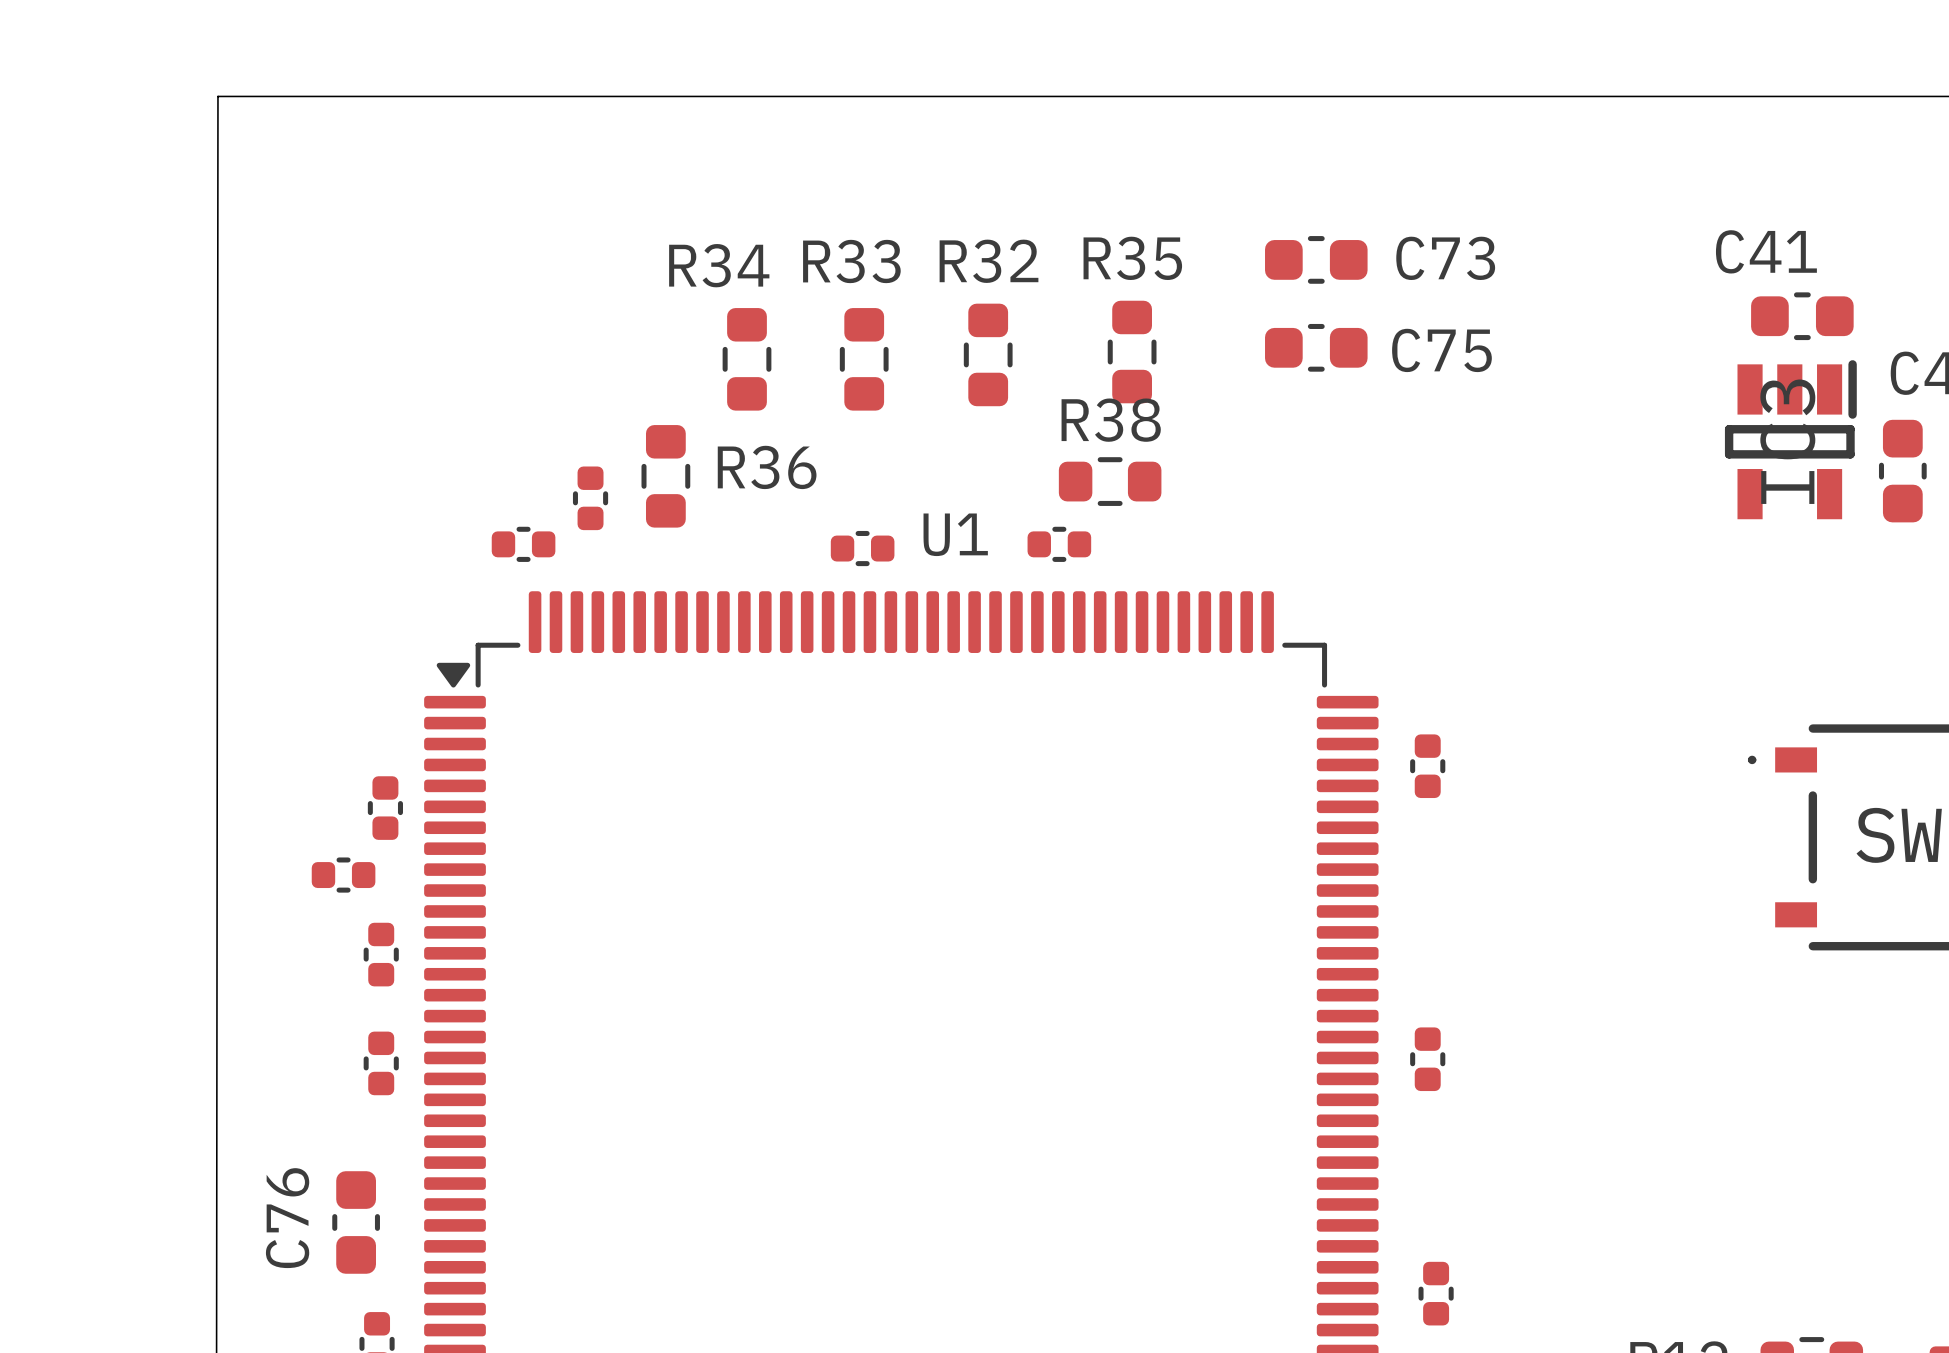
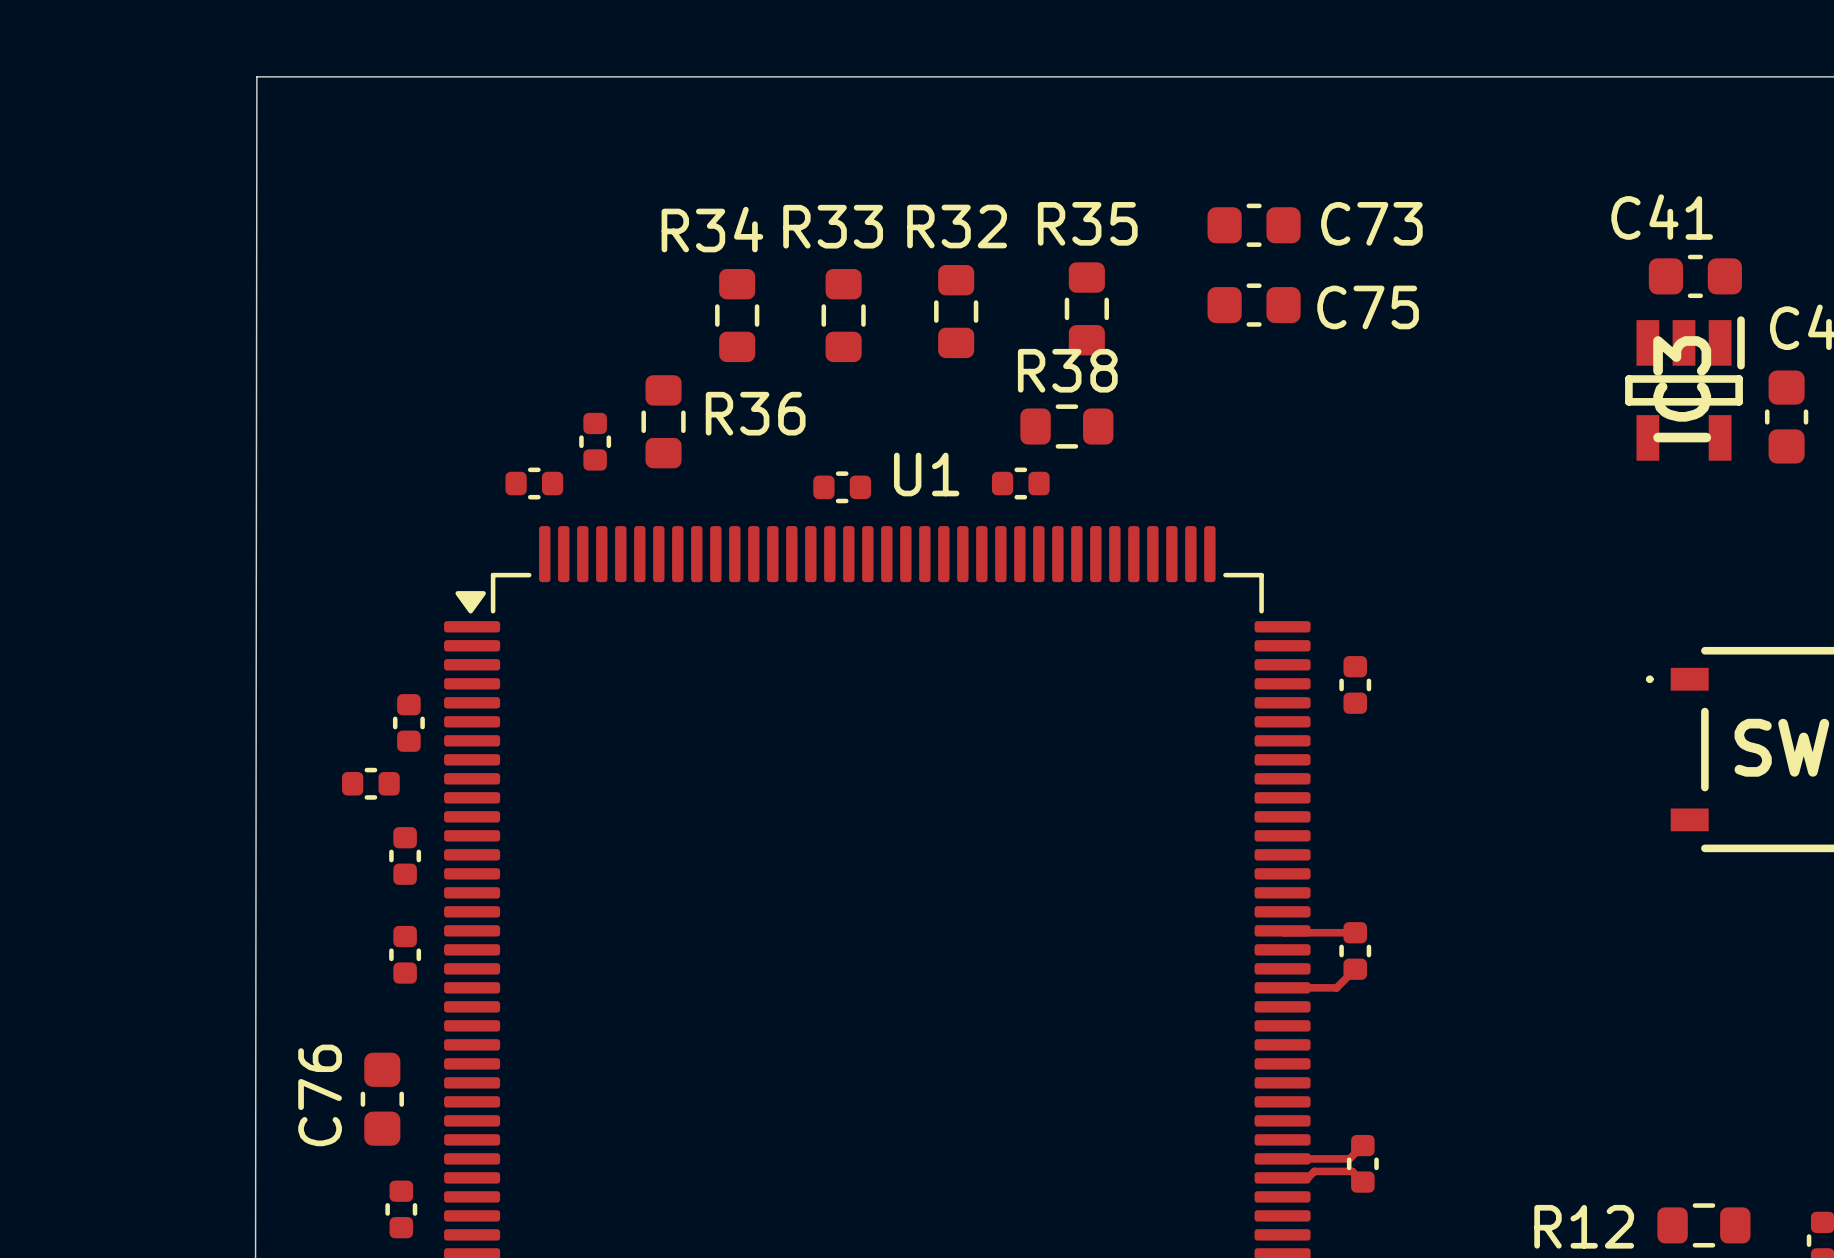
track: none -> (1282, 930) (1284, 932) (1355, 932)
track: none -> (1355, 969) (1336, 987) (1282, 987)
track: none -> (1362, 1145) (1349, 1158) (1282, 1158)
track: none -> (1282, 1177) (1307, 1177) (1314, 1171) (1352, 1171) (1362, 1182)

